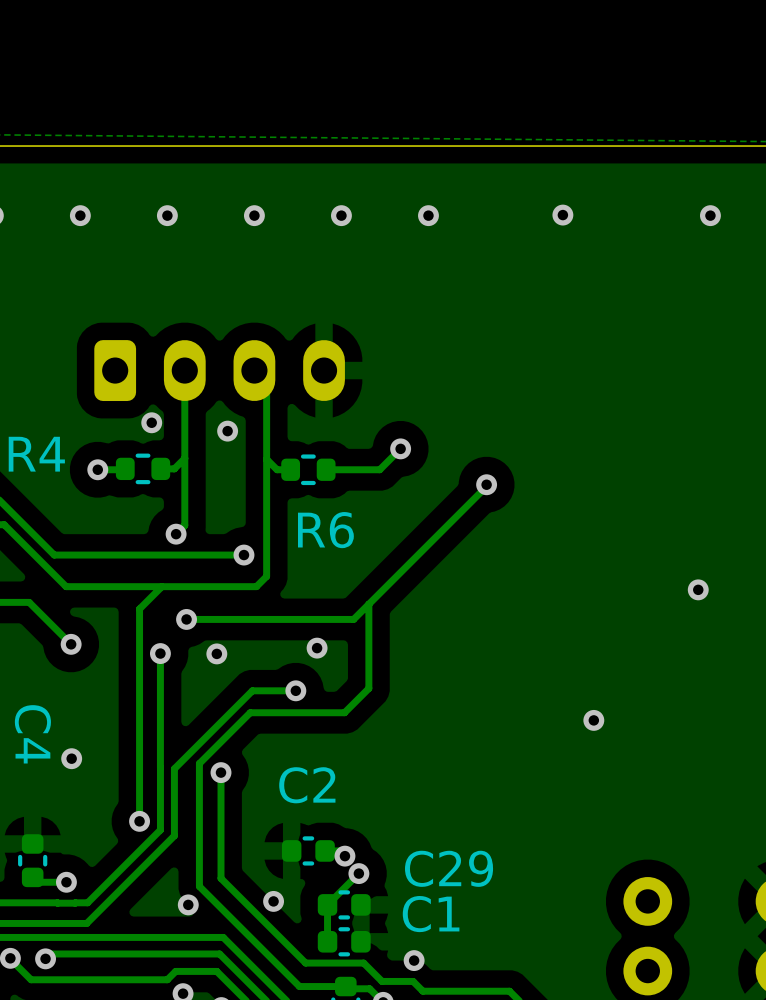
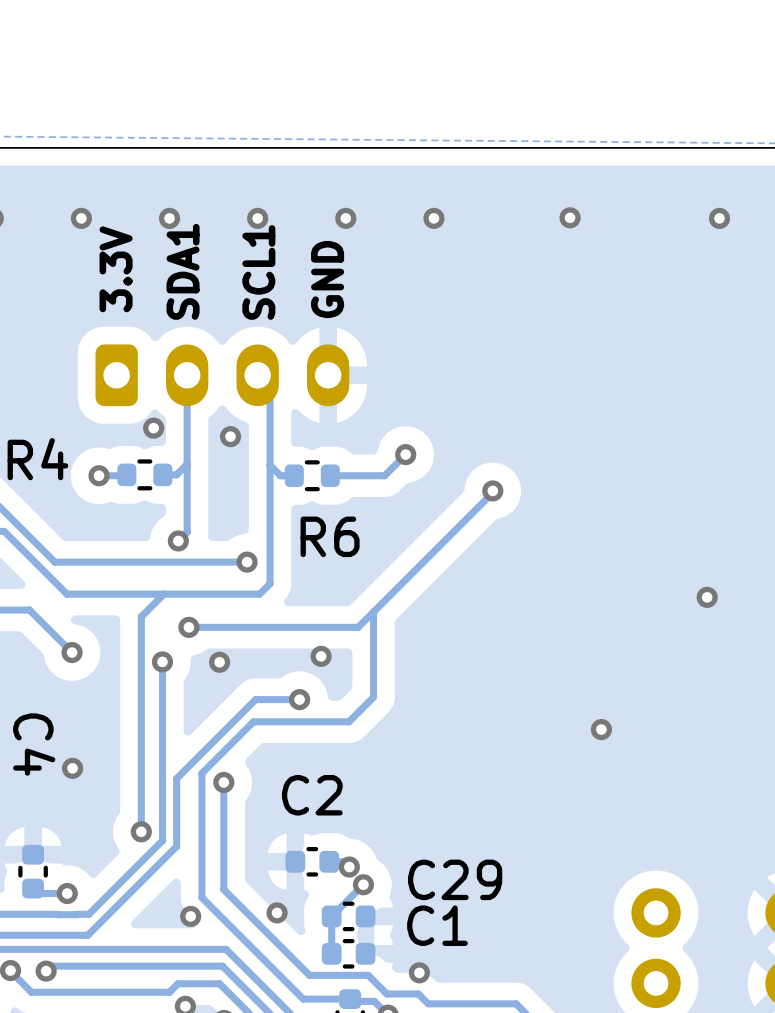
text: none -> 3.3V (116, 269)
text: none -> SDA1 (183, 271)
text: none -> SCL1 (258, 272)
text: none -> GND (327, 279)

